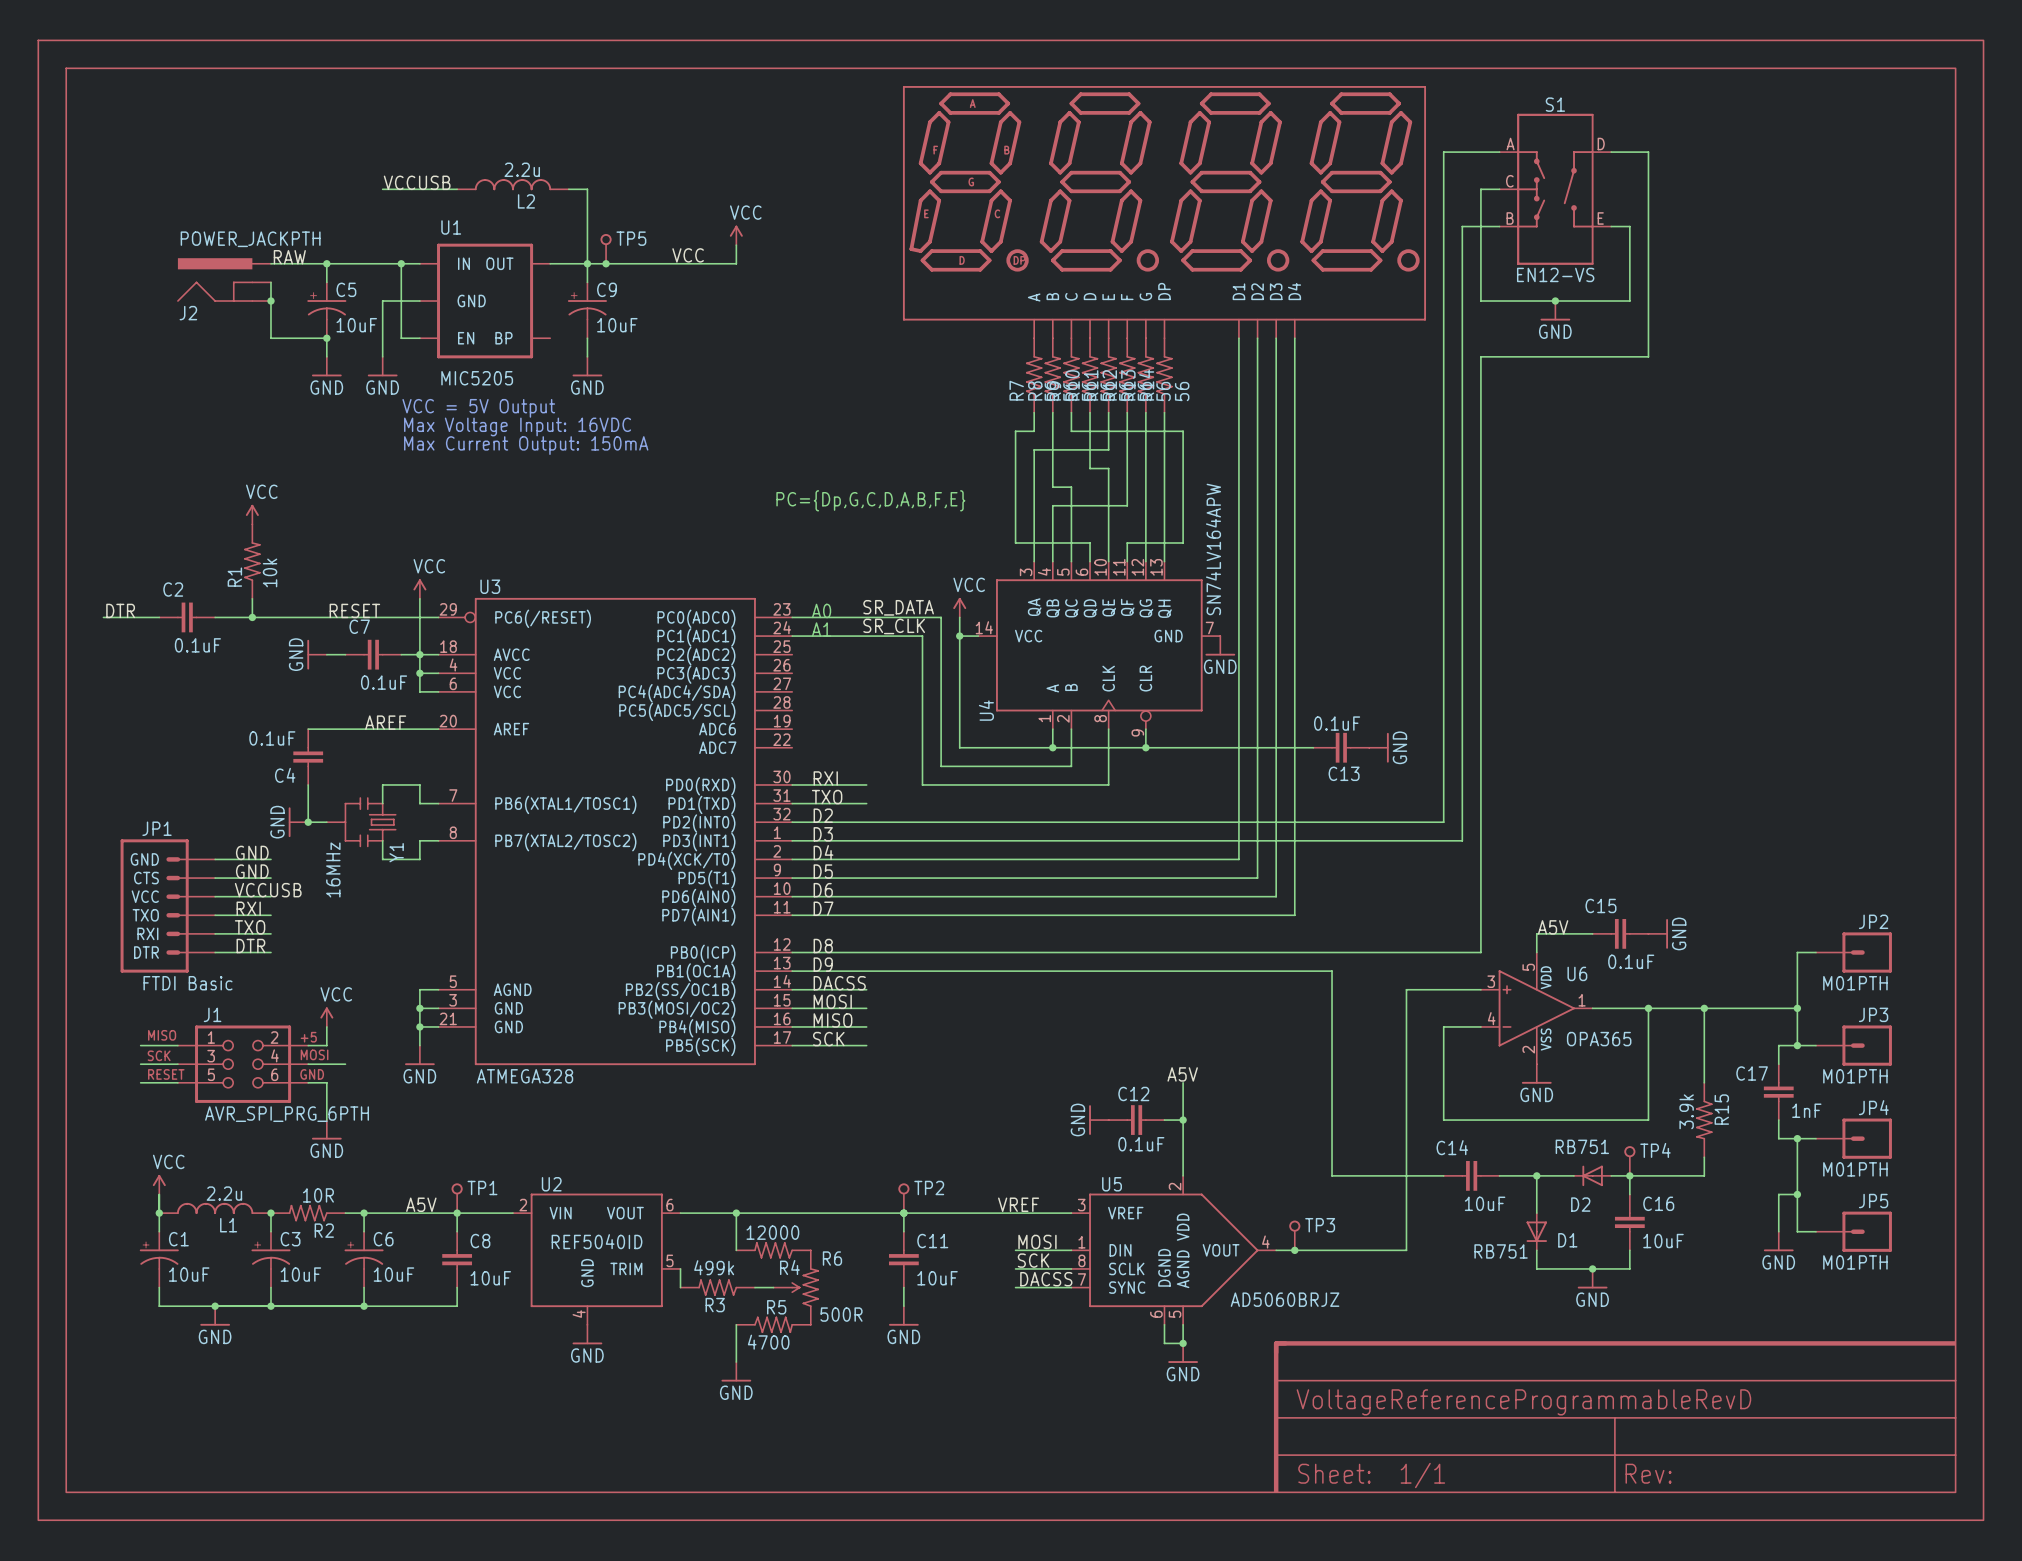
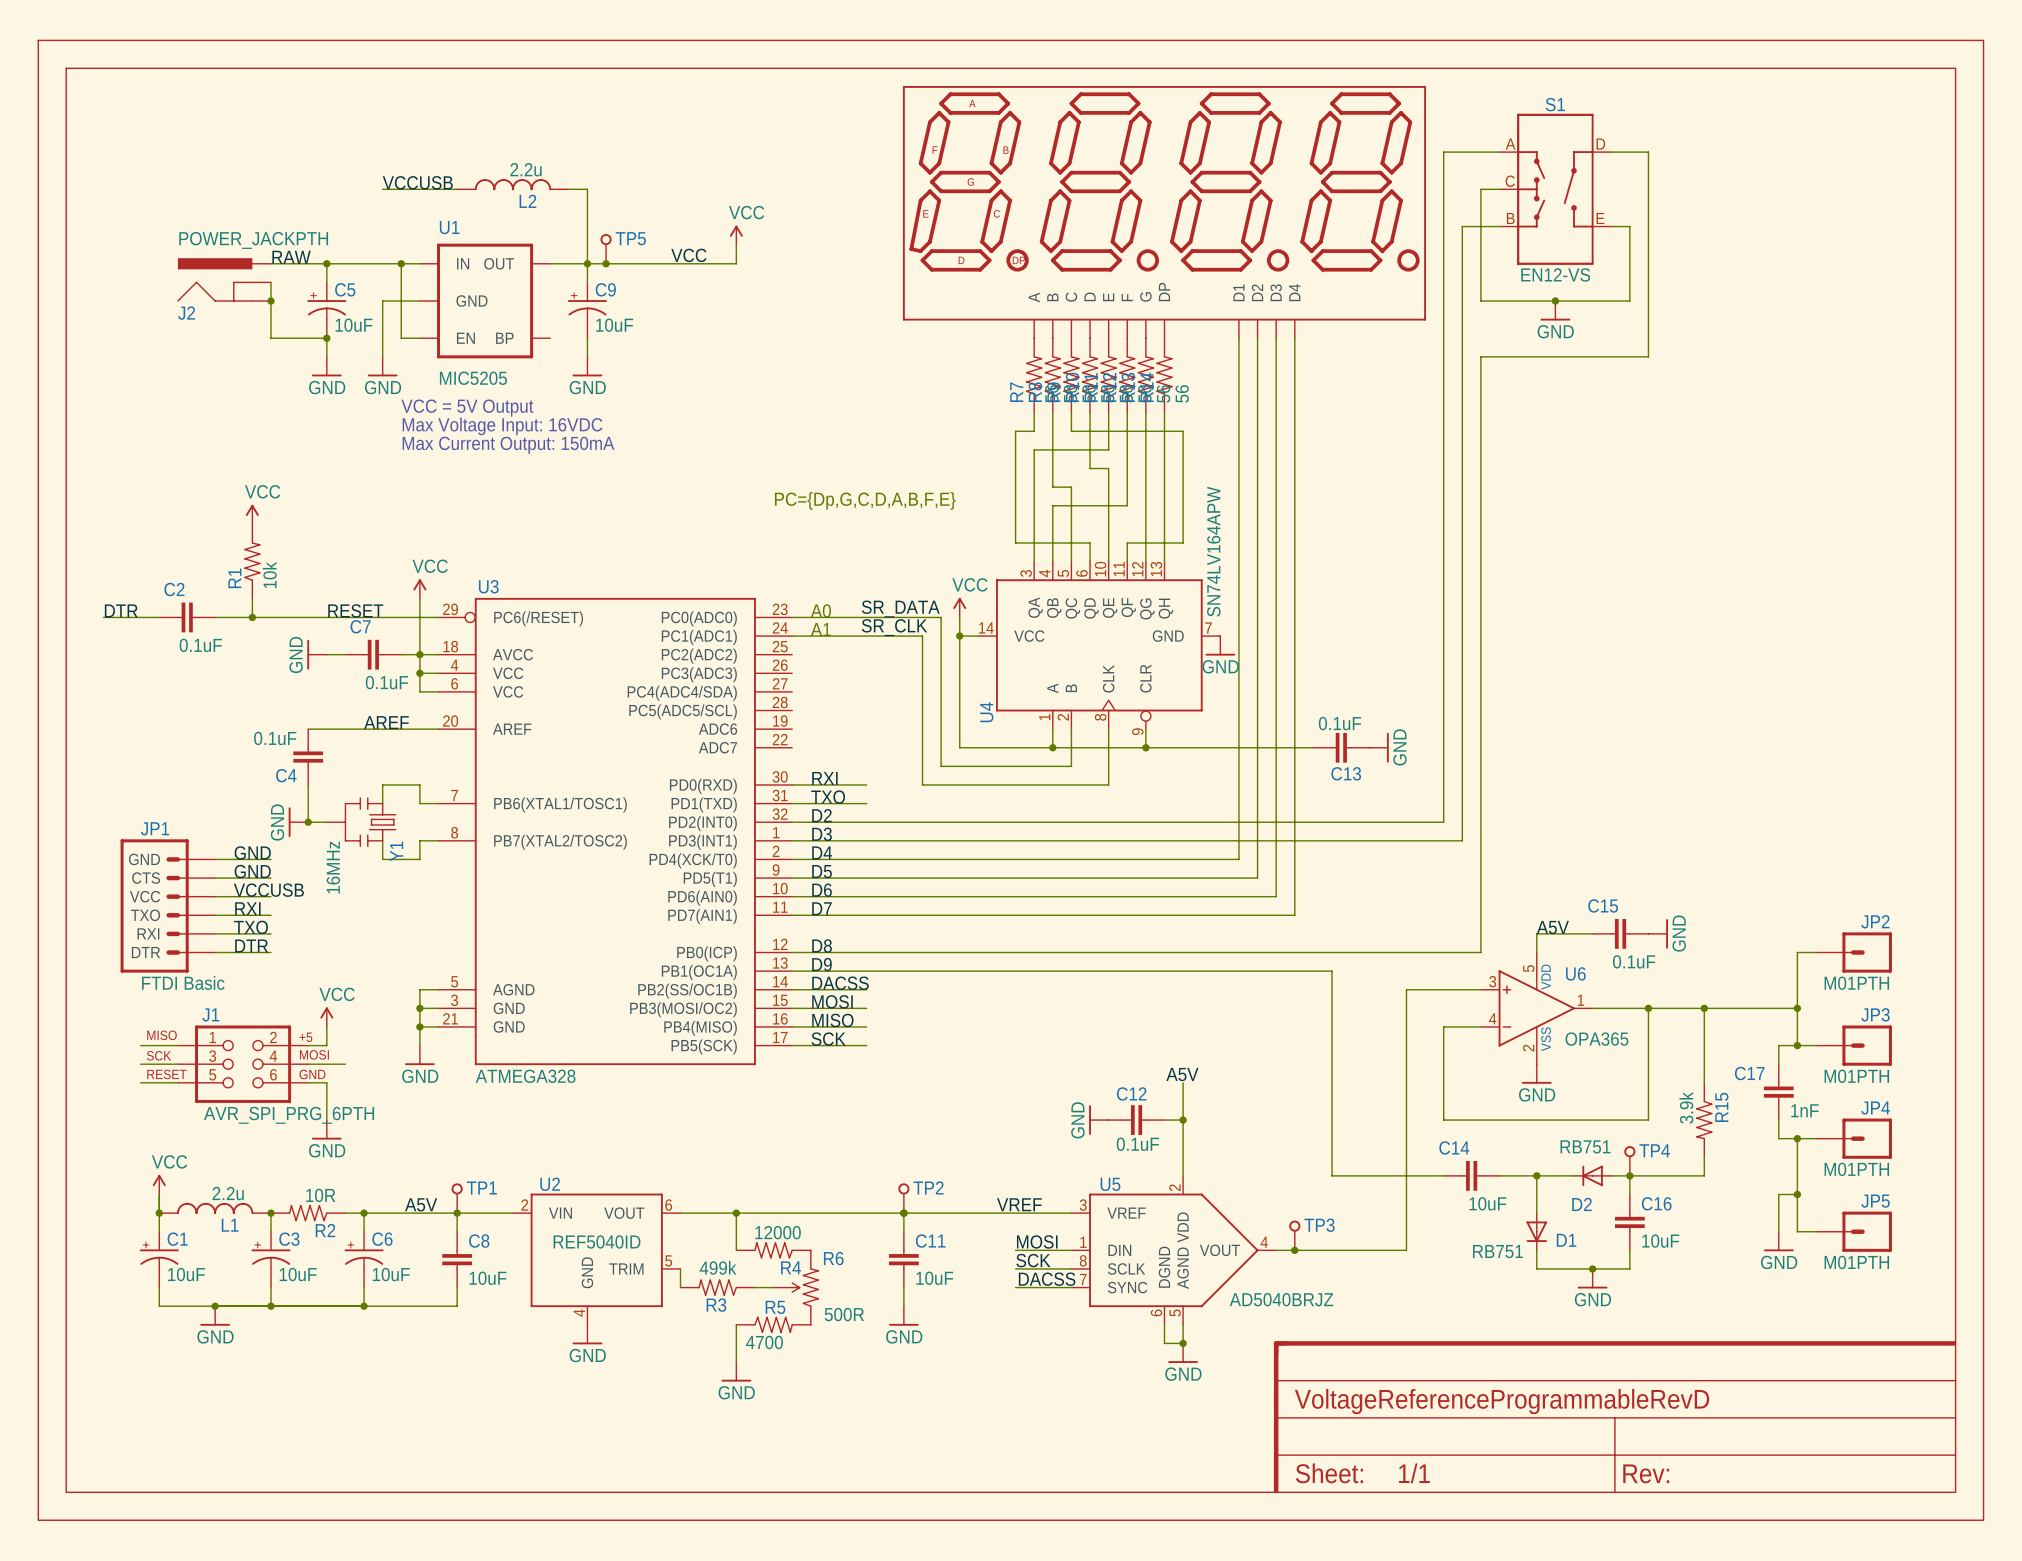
U5 value: AD5060BRJZ (1285, 1299) -> AD5040BRJZ (1281, 1299)

